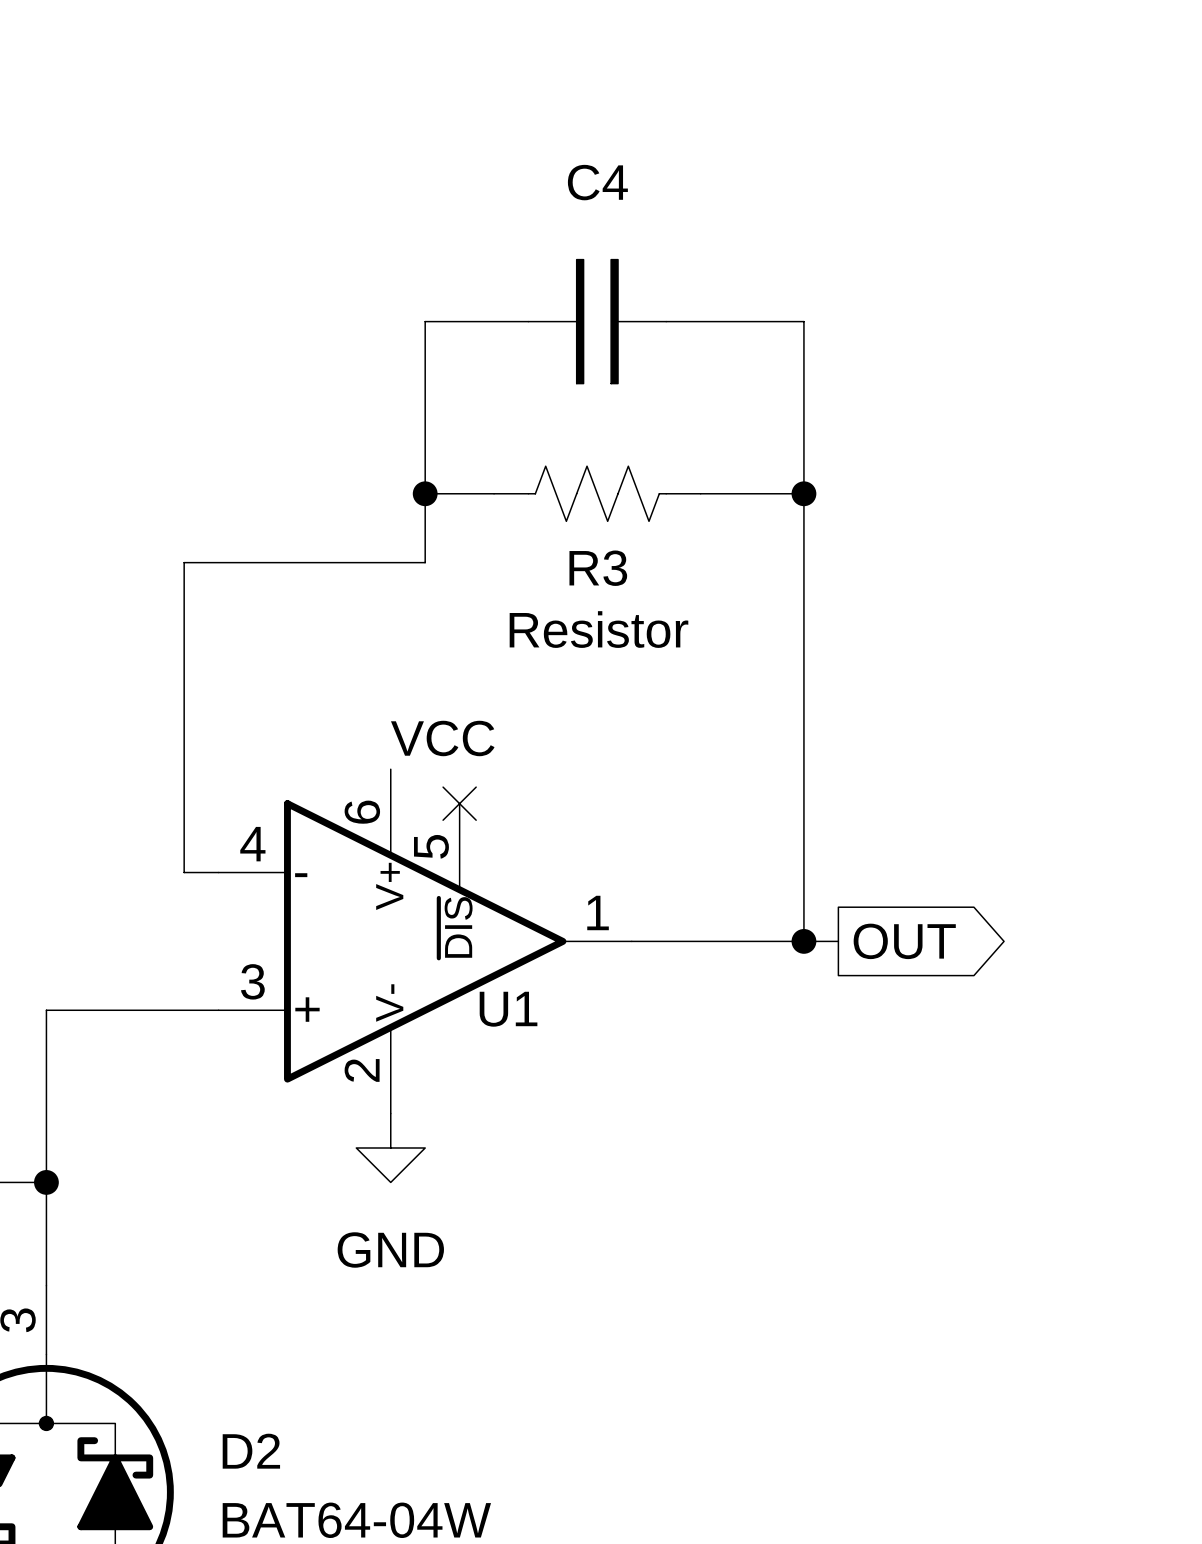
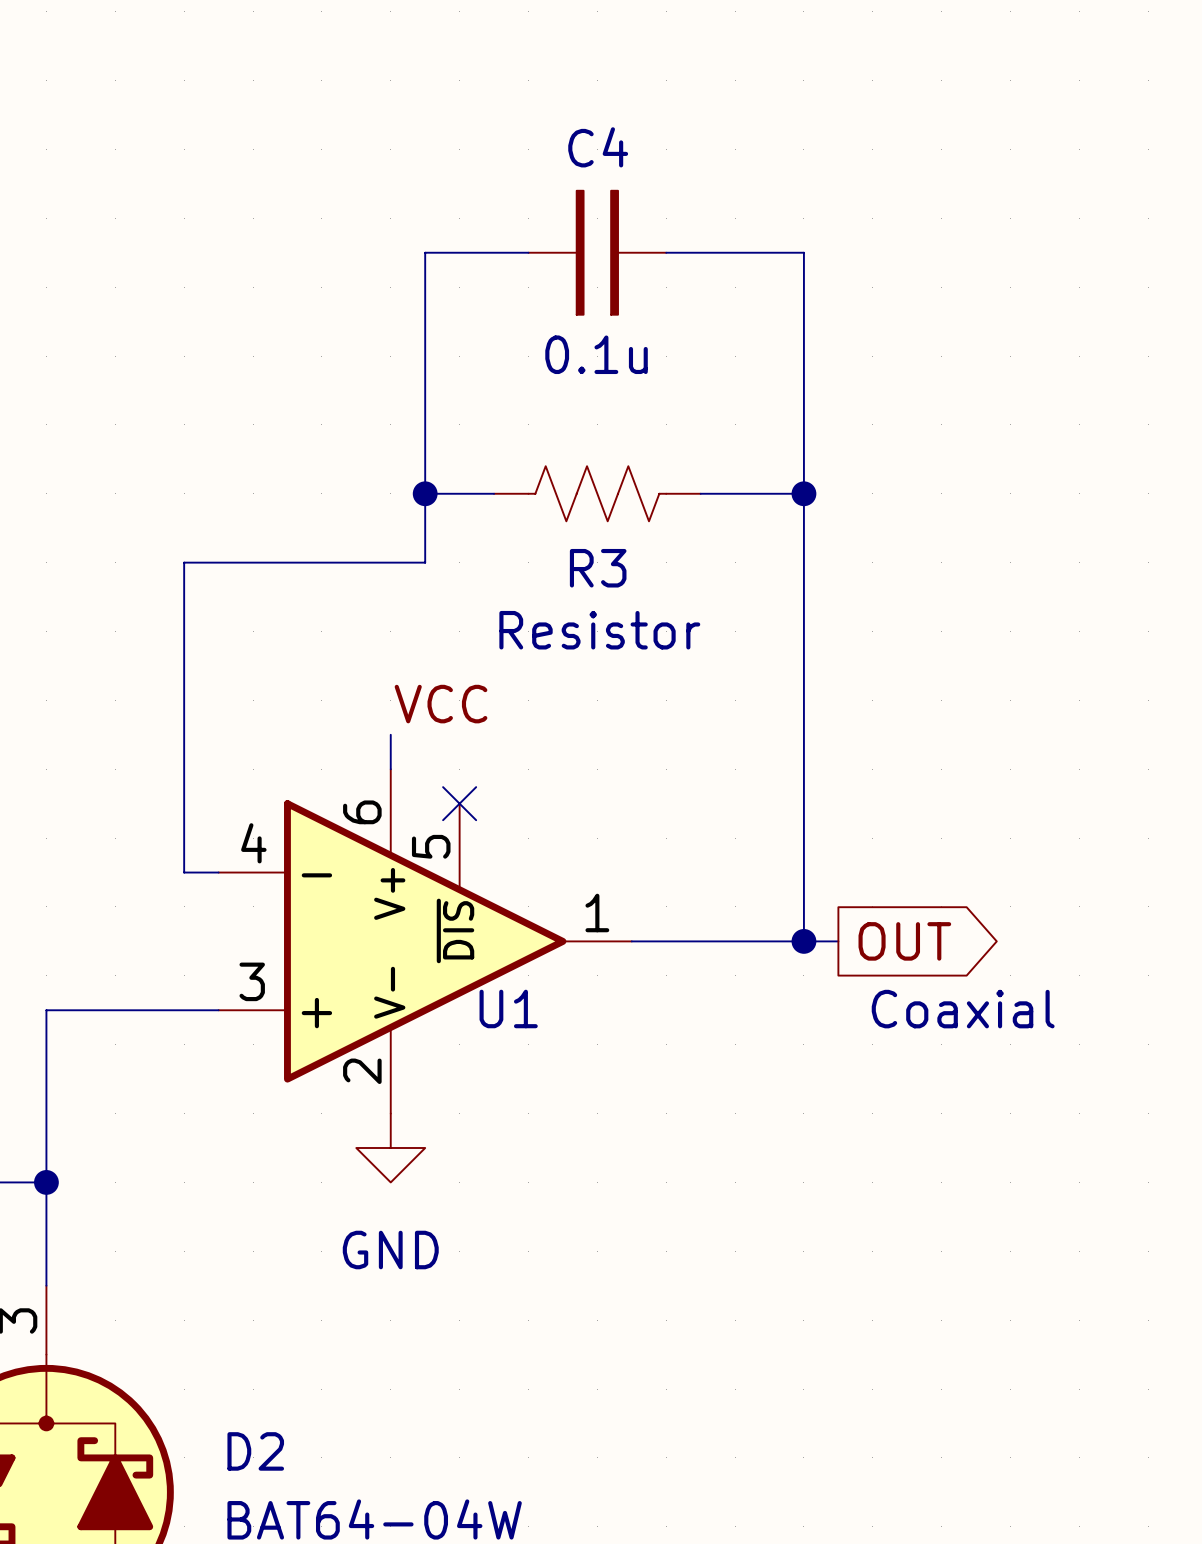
C4 name position: C4 (597, 182) -> C4 (598, 147)
wire: (425, 321) (528, 321) -> (425, 321) (425, 252) (528, 252)
C4 position: (597, 321) -> (597, 252)
wire: (666, 321) (803, 321) -> (666, 252) (803, 252) (803, 321)
C4 value: none -> 0.1u (596, 354)
wire: none -> (390, 734) (390, 769)
label position: VCC (442, 738) -> VCC (441, 704)
text: none -> Coaxial (963, 1009)

